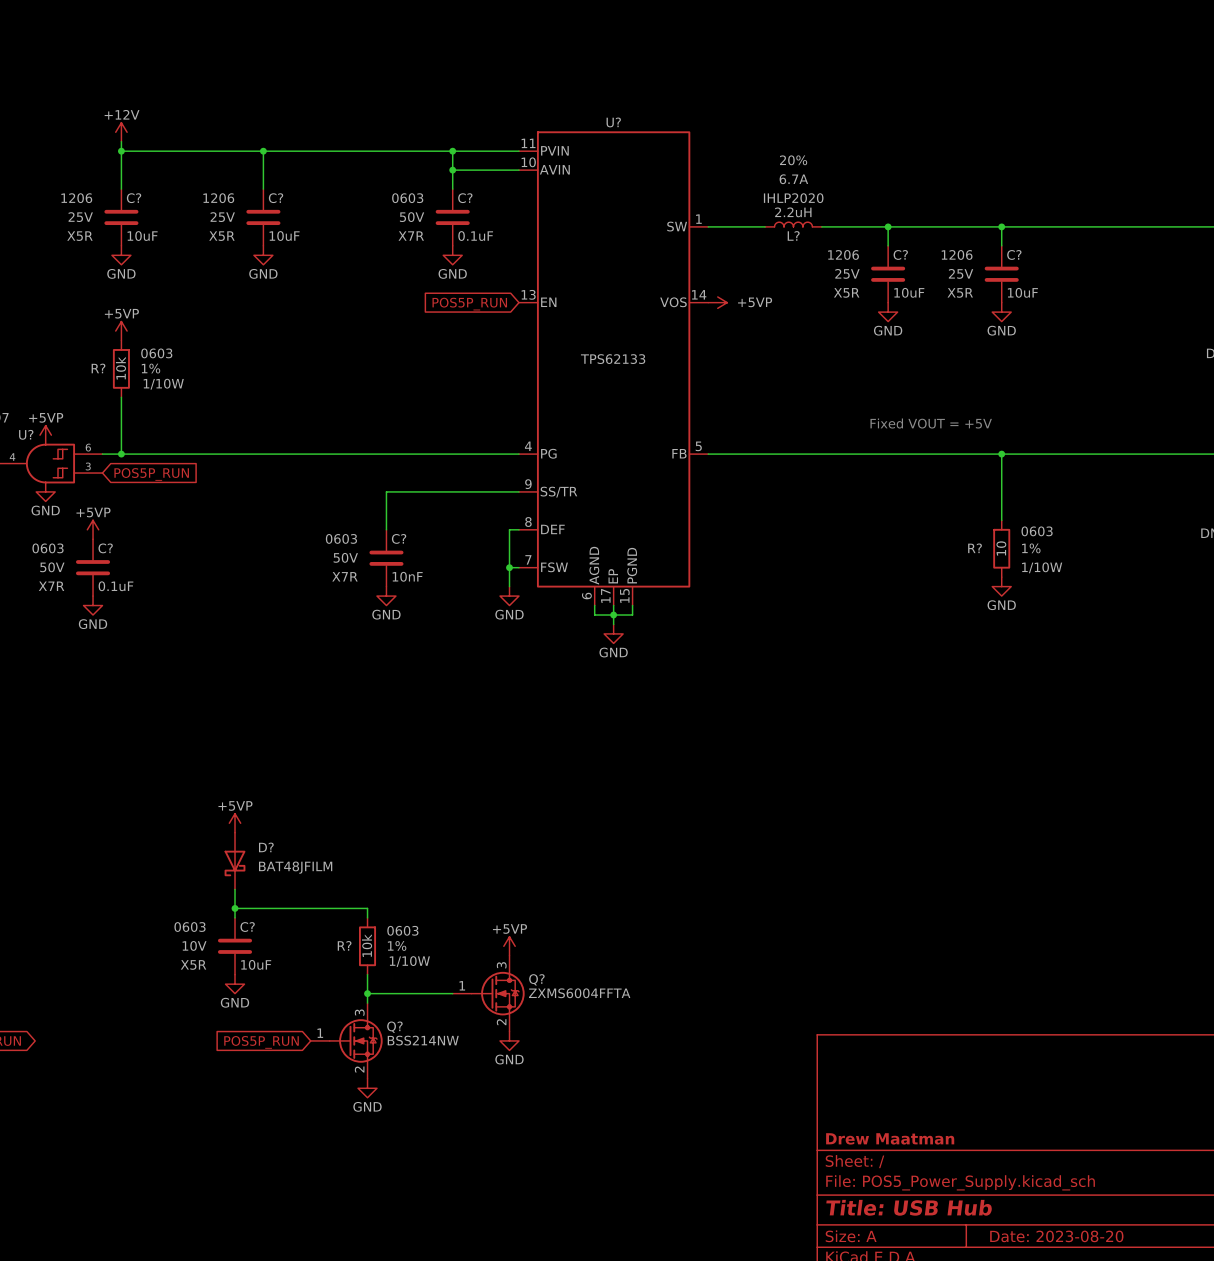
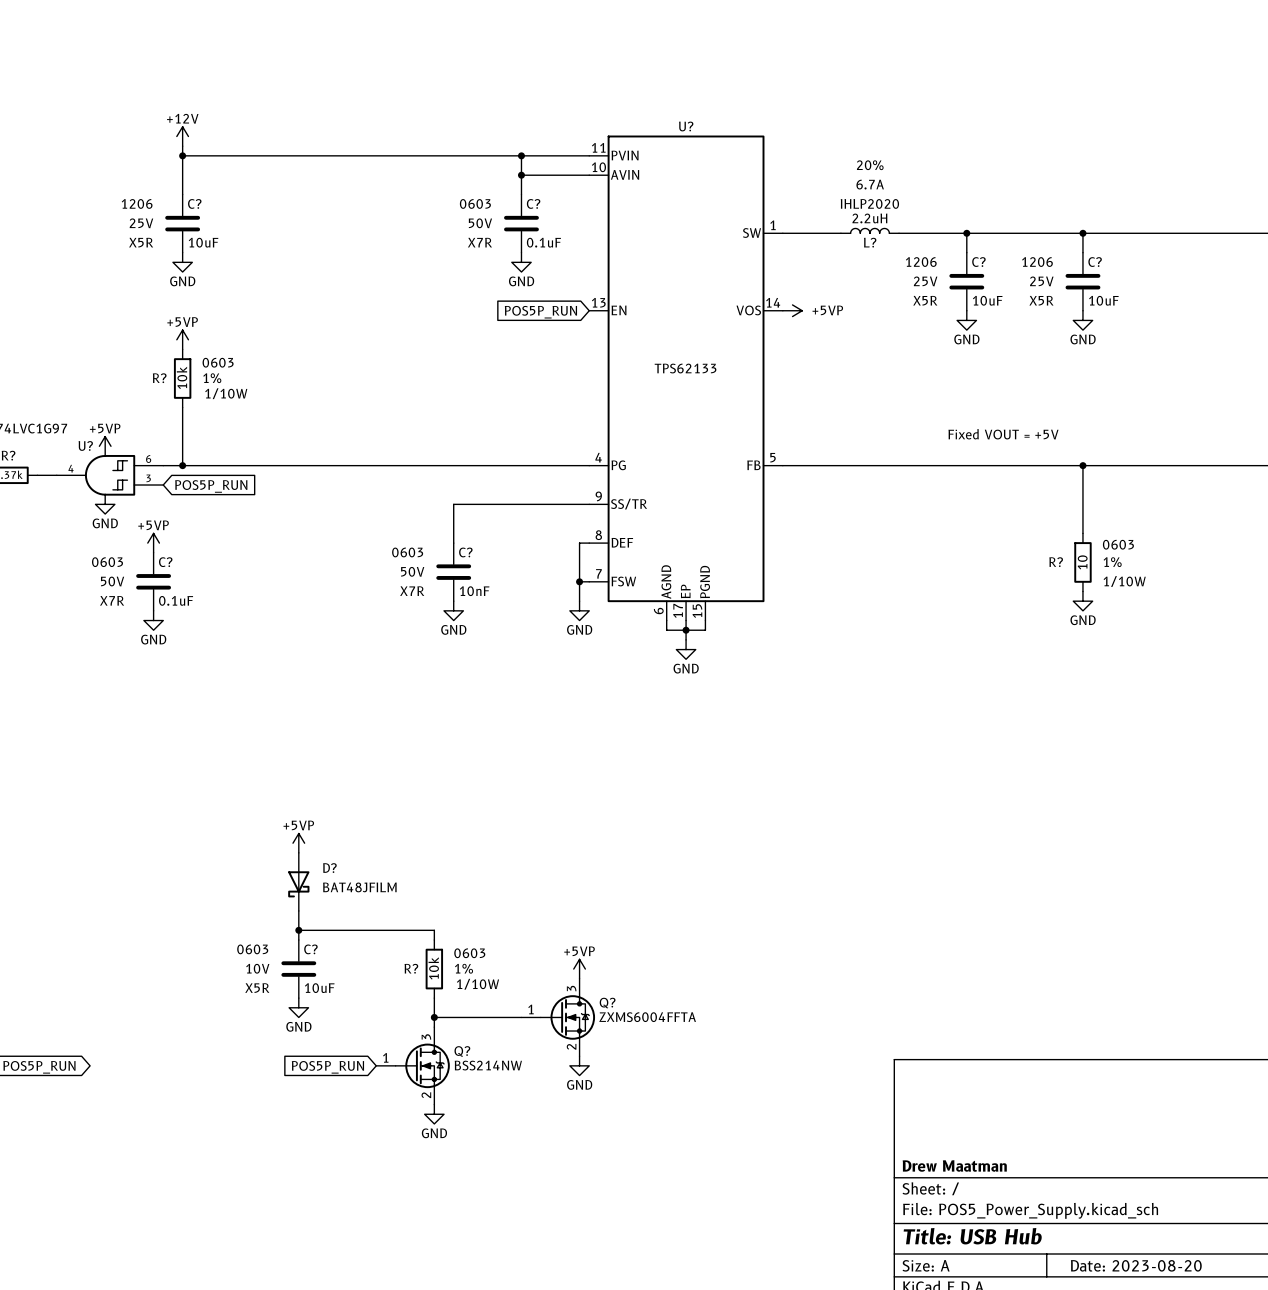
wire: (263, 151) (263, 189) -> none
junction: (263, 151) -> none
C?: 10uF (263, 217) -> none
power symbol: GND (263, 255) -> none

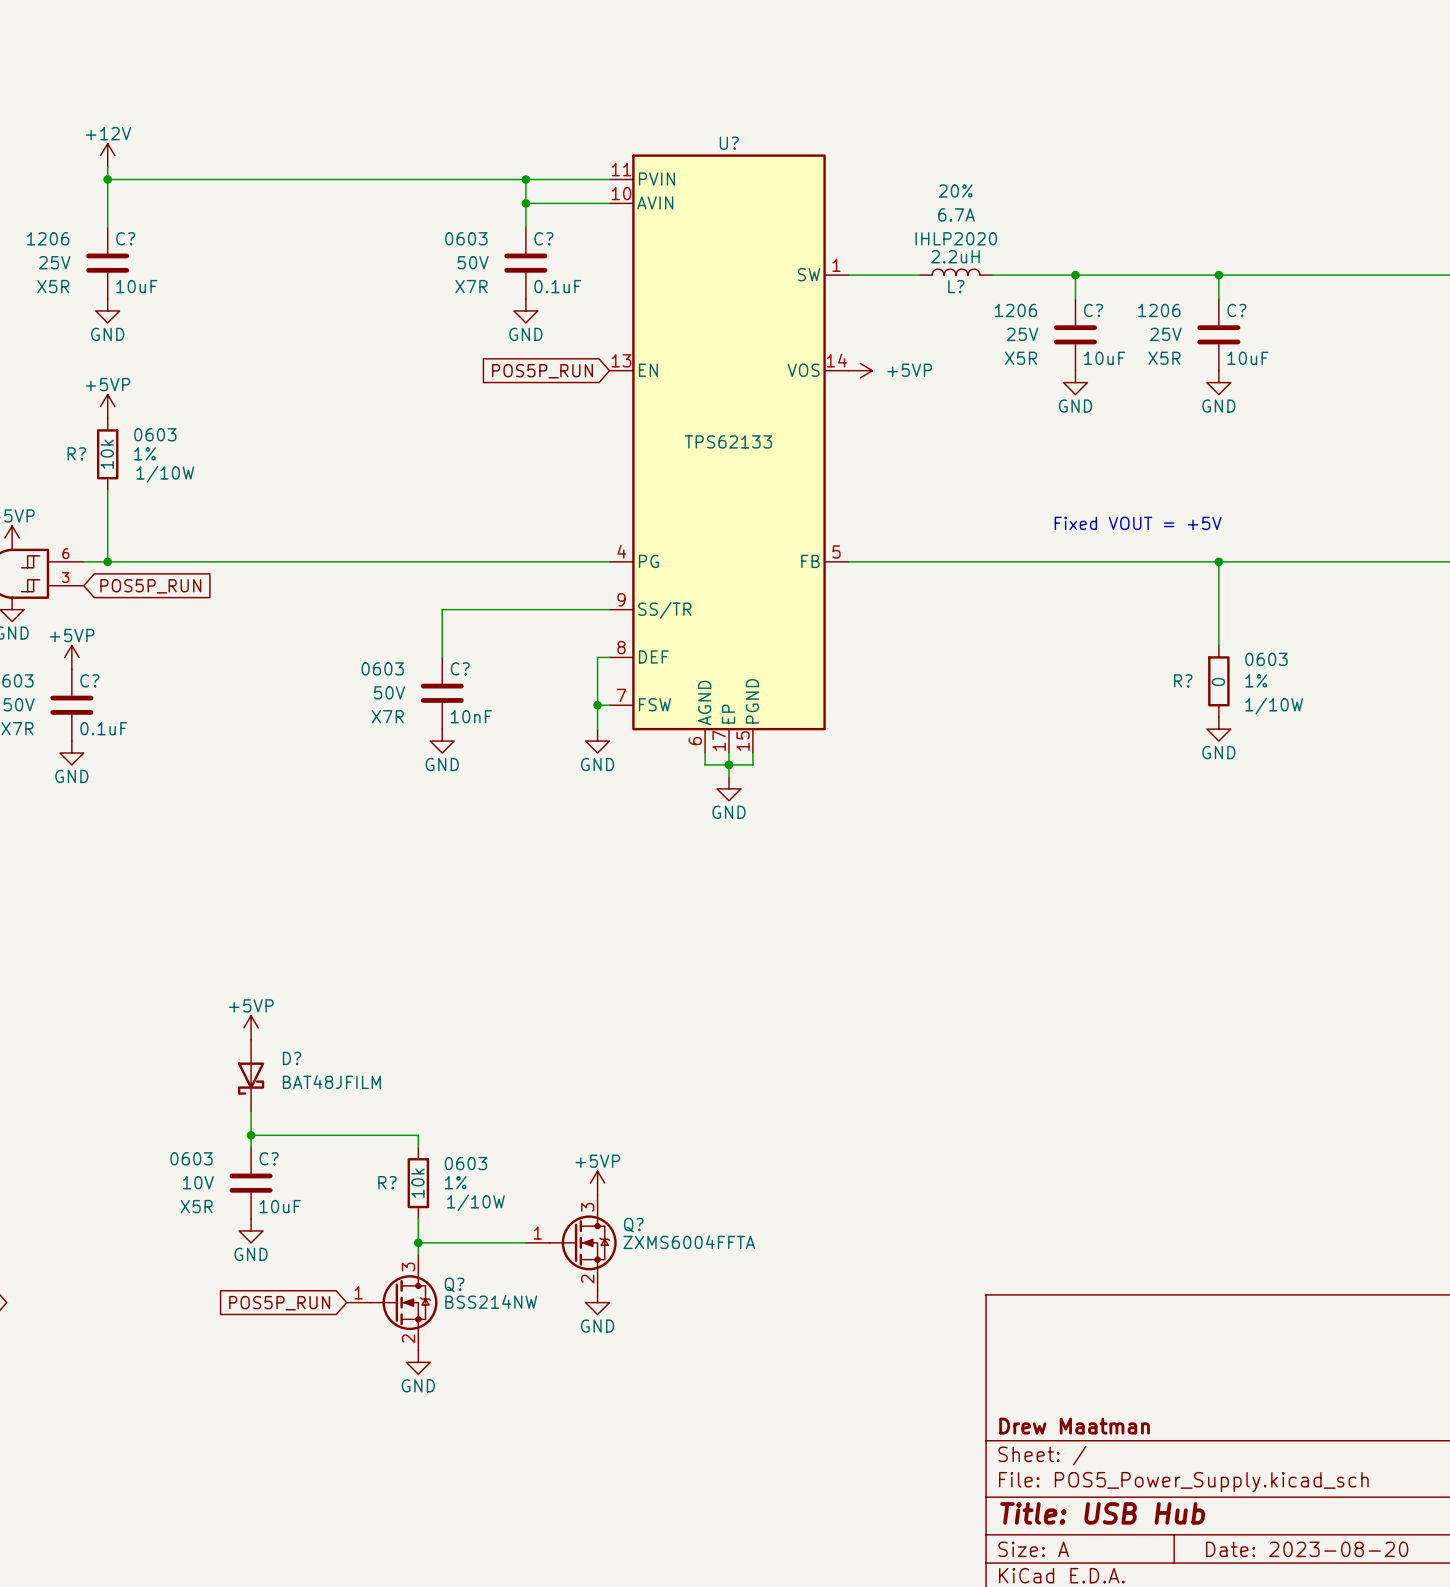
R? value: 10 (1082, 562) -> 0 (1218, 681)

